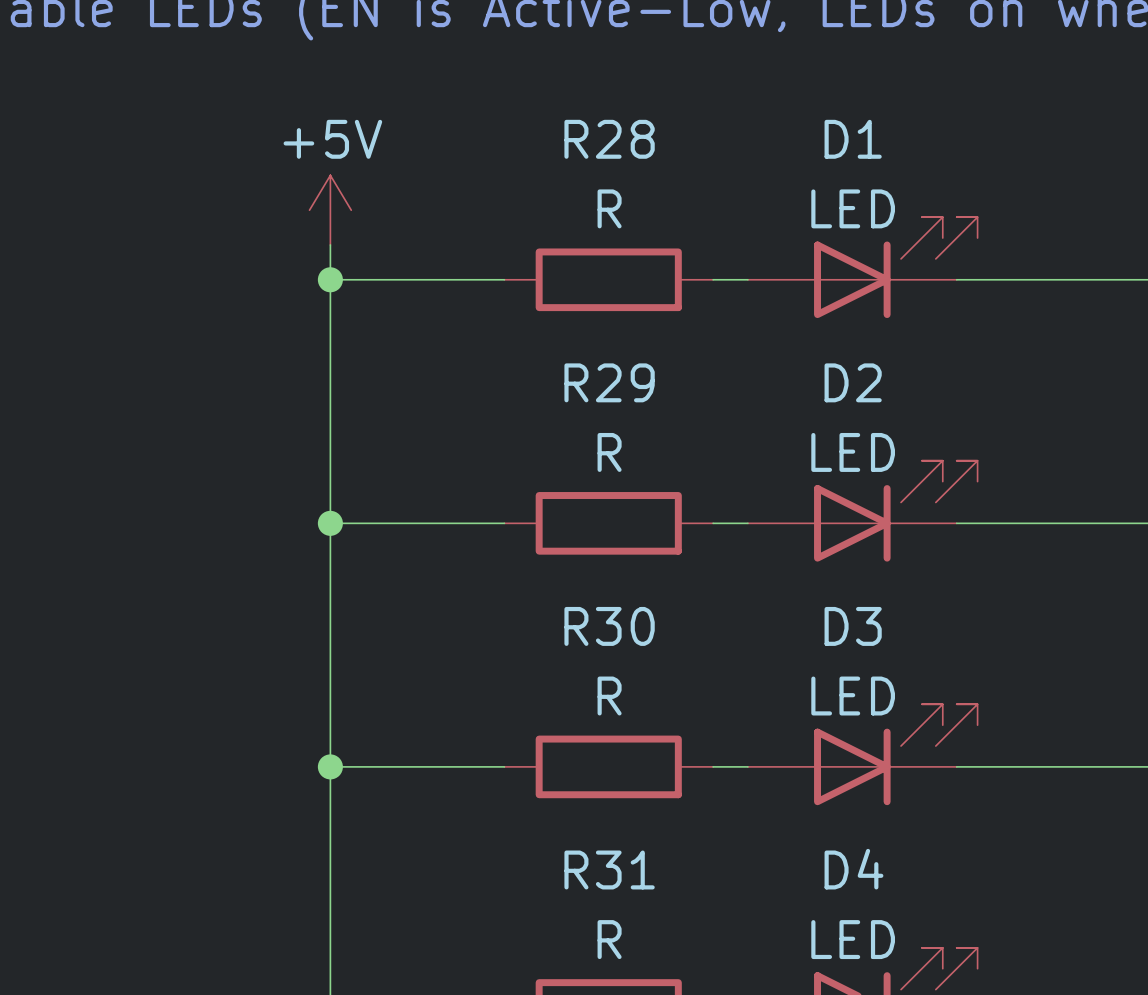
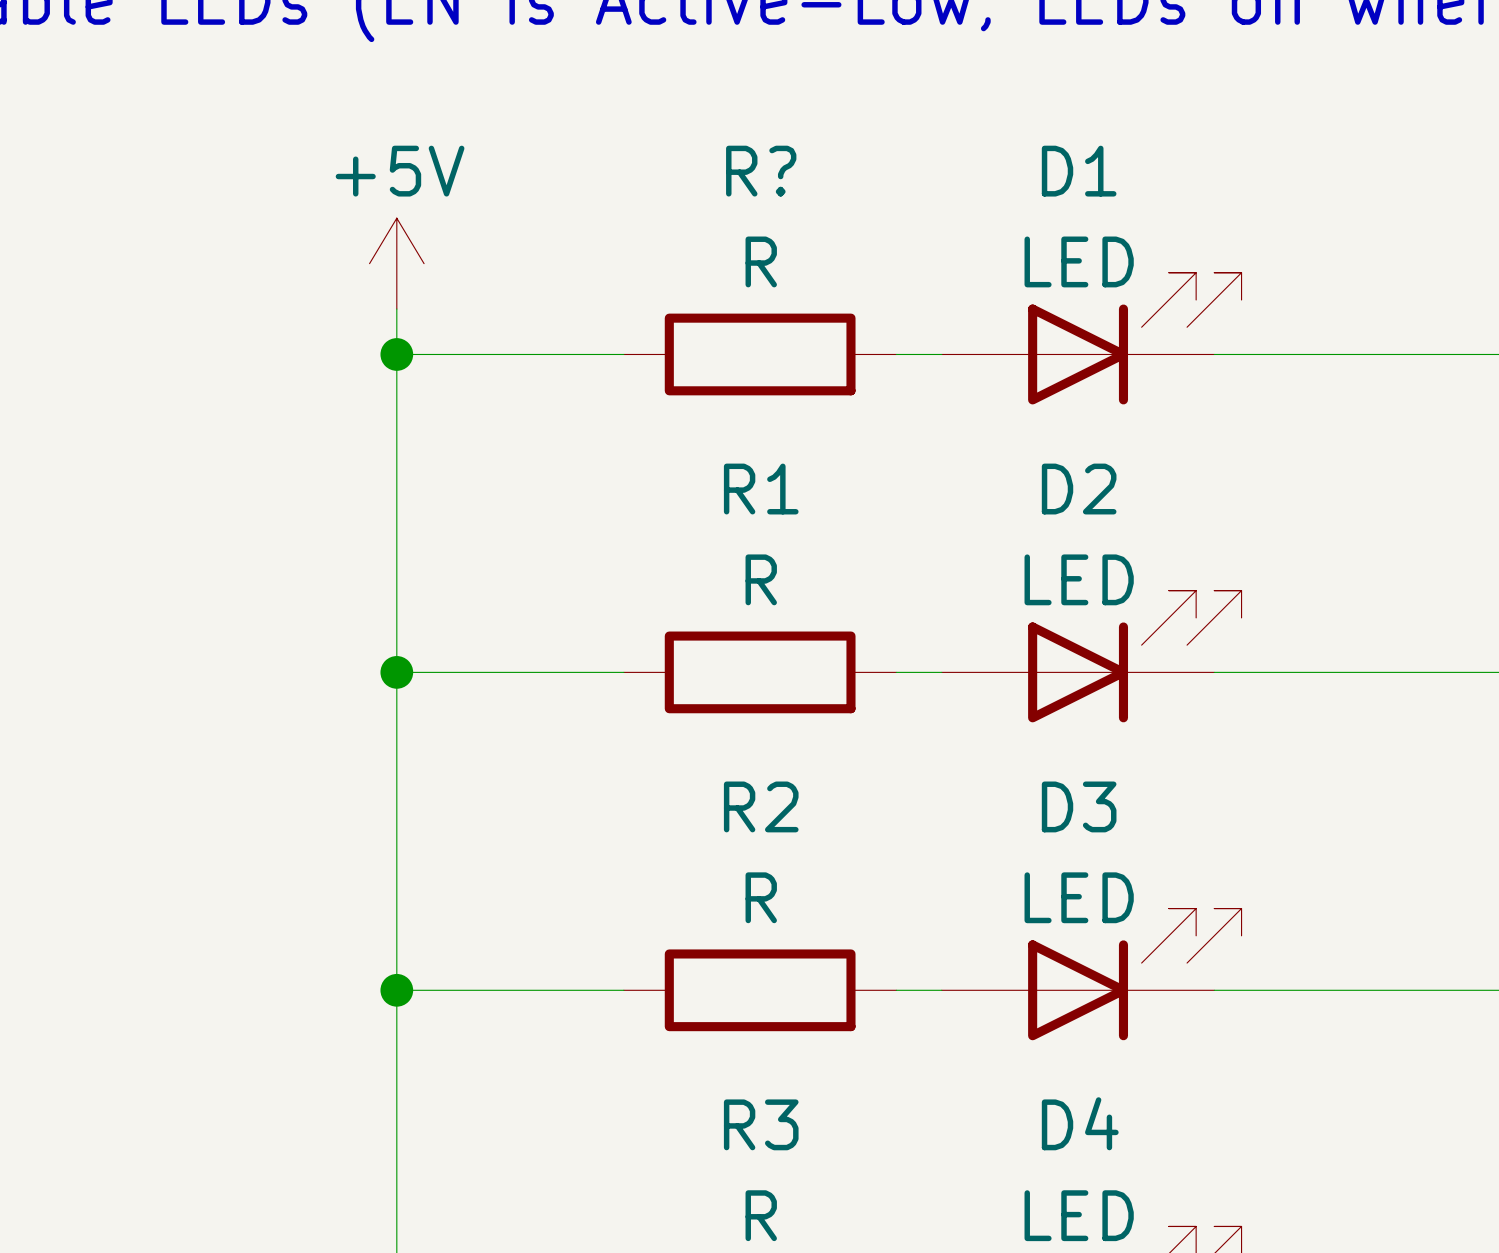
R28 name: R28 (609, 139) -> R? (761, 171)
R29 name: R29 (609, 382) -> R1 (761, 489)
R30 name: R30 (609, 626) -> R2 (761, 806)
R31 name: R31 (609, 869) -> R3 (761, 1124)

